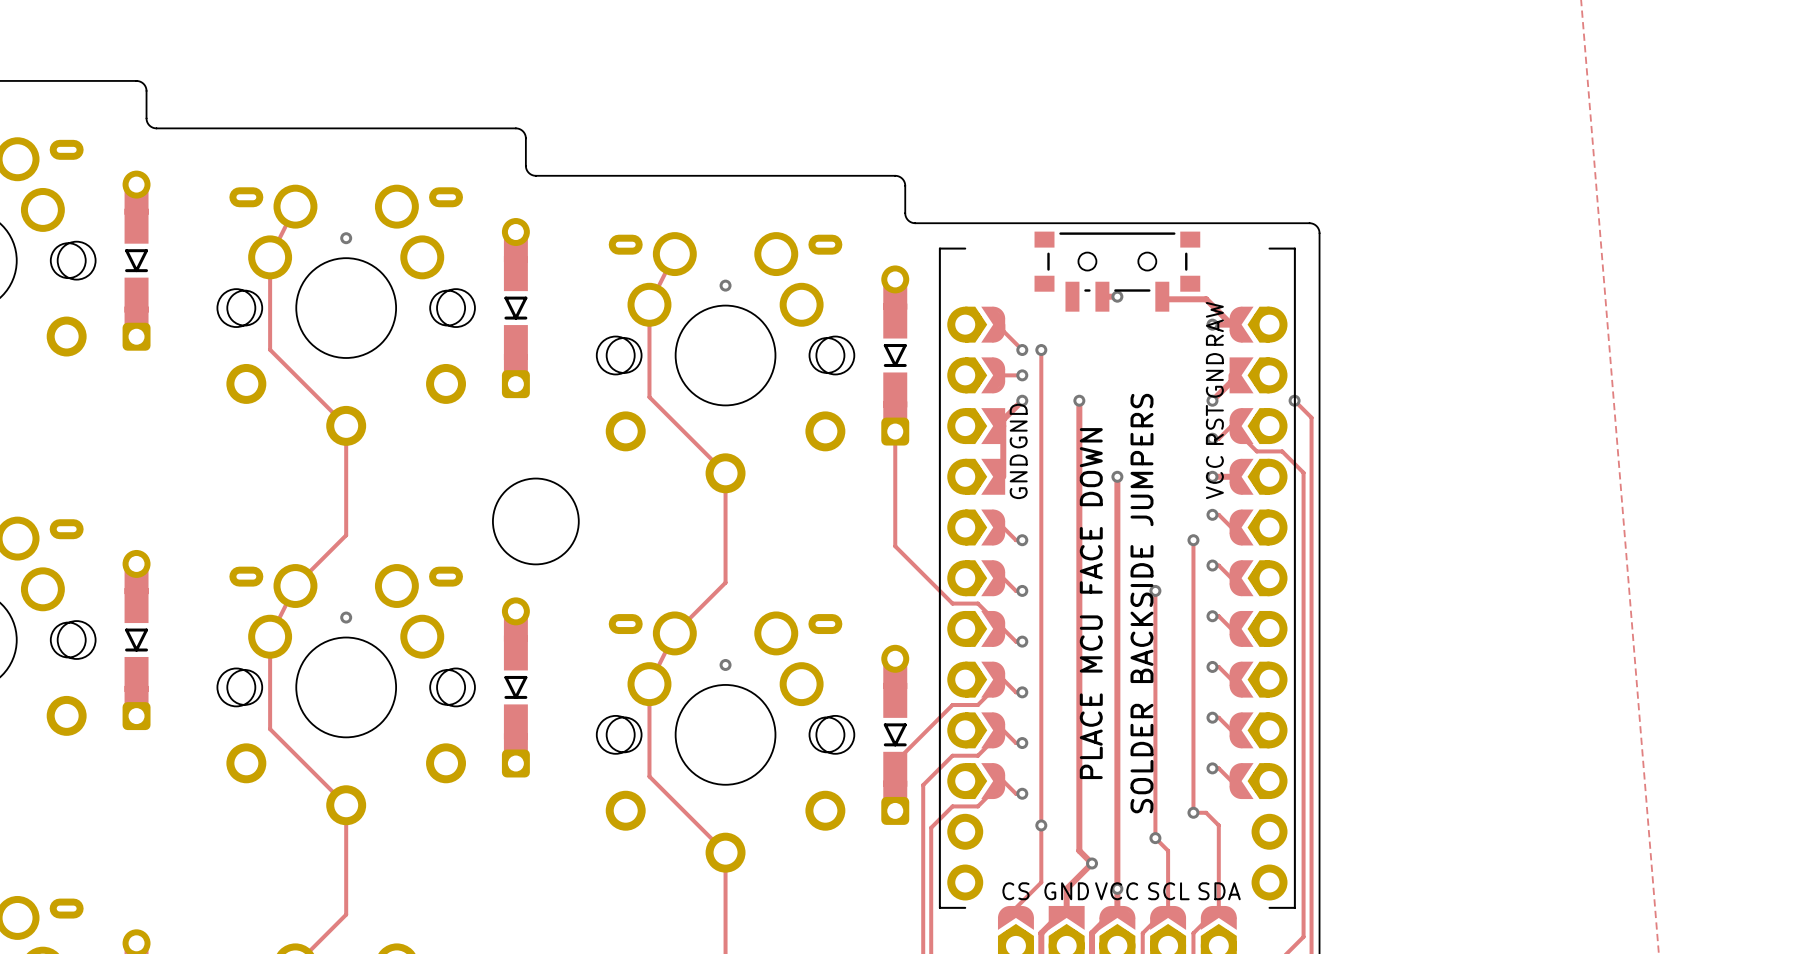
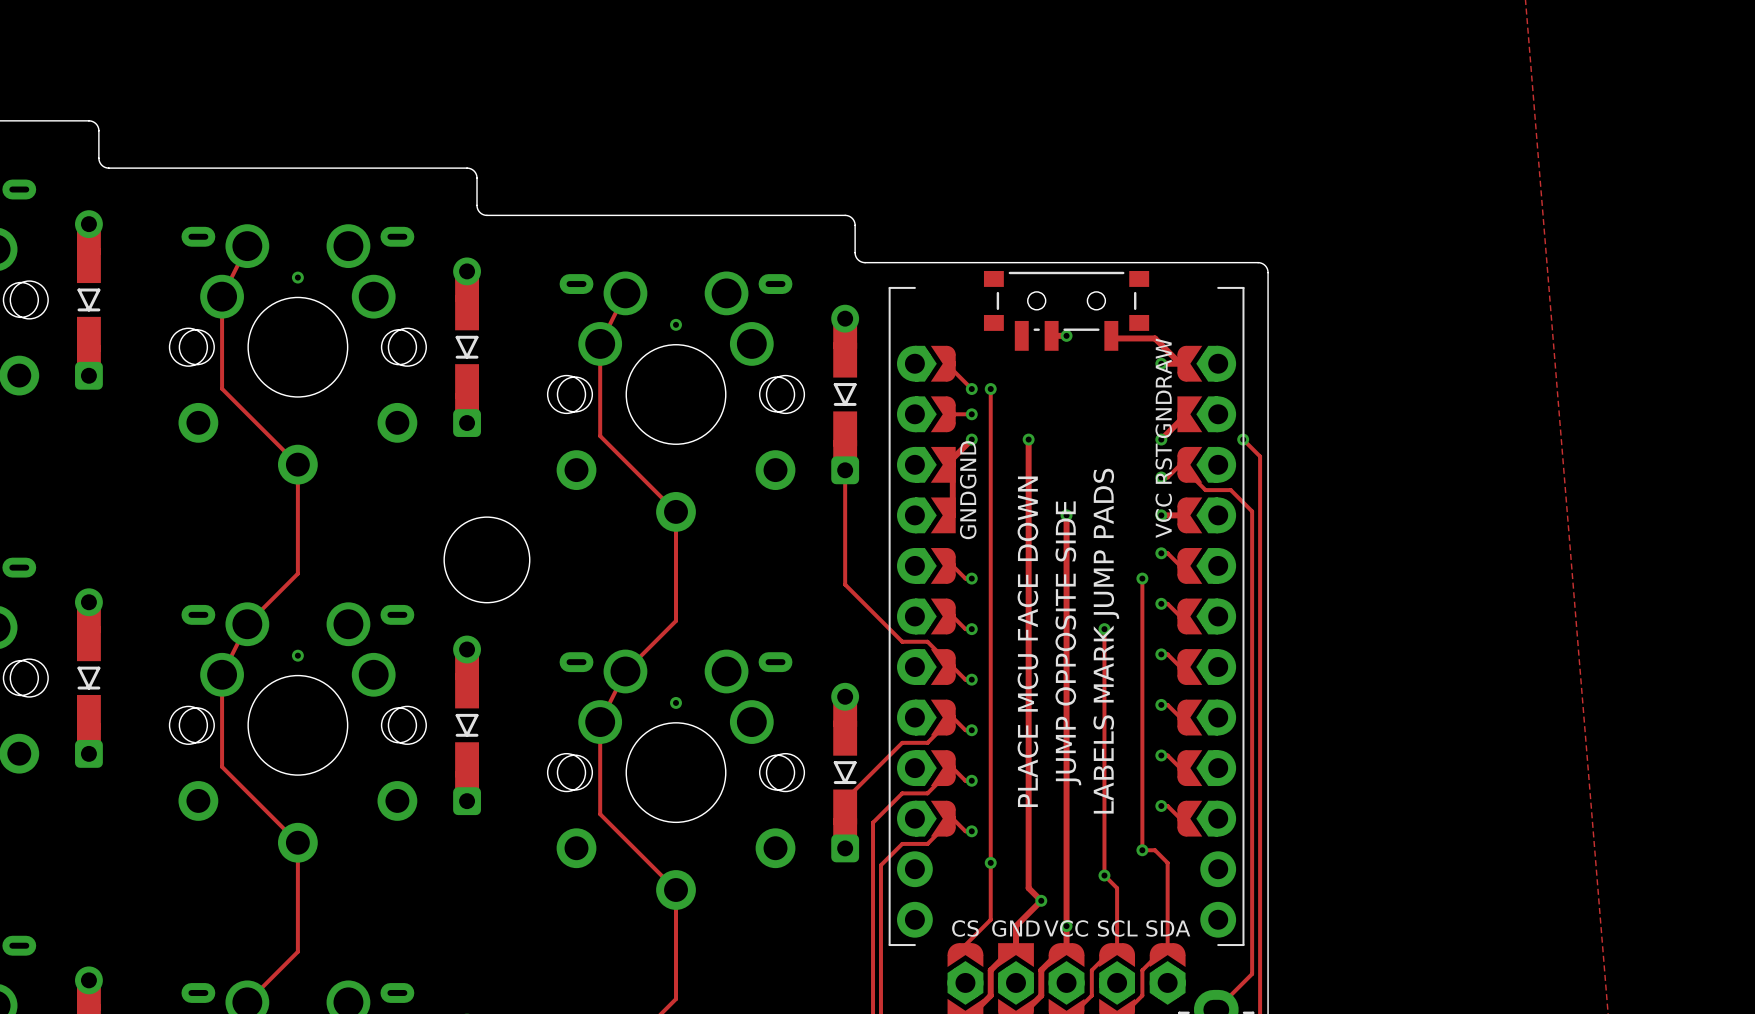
part footprint: [938, 247, 1296, 909] -> [888, 286, 1245, 947]

